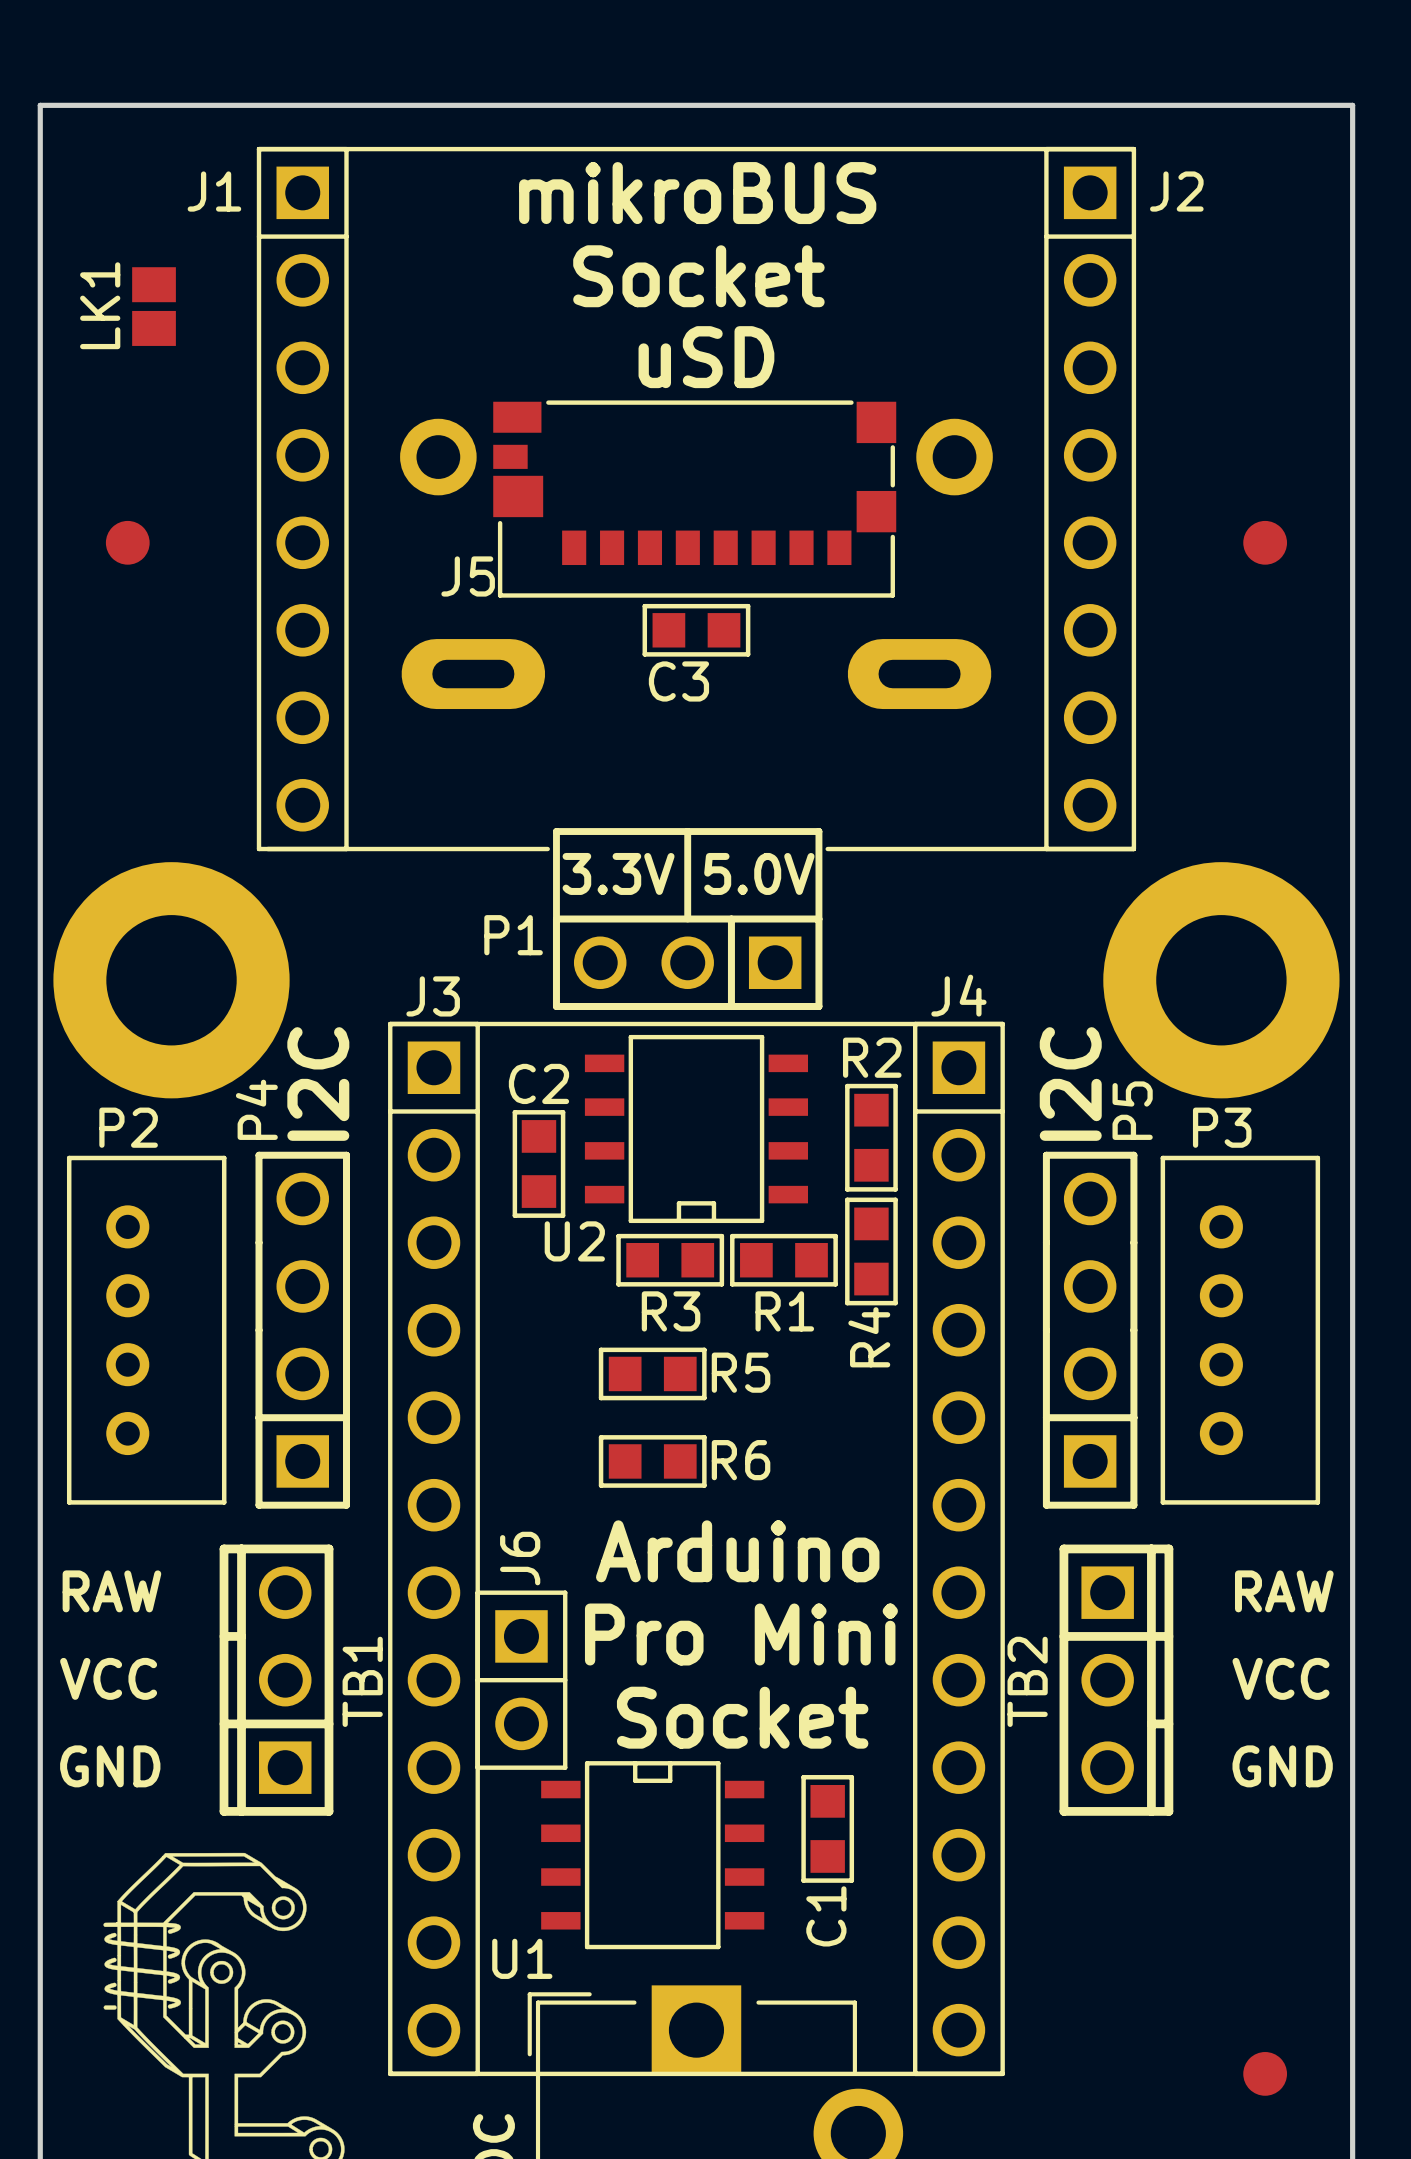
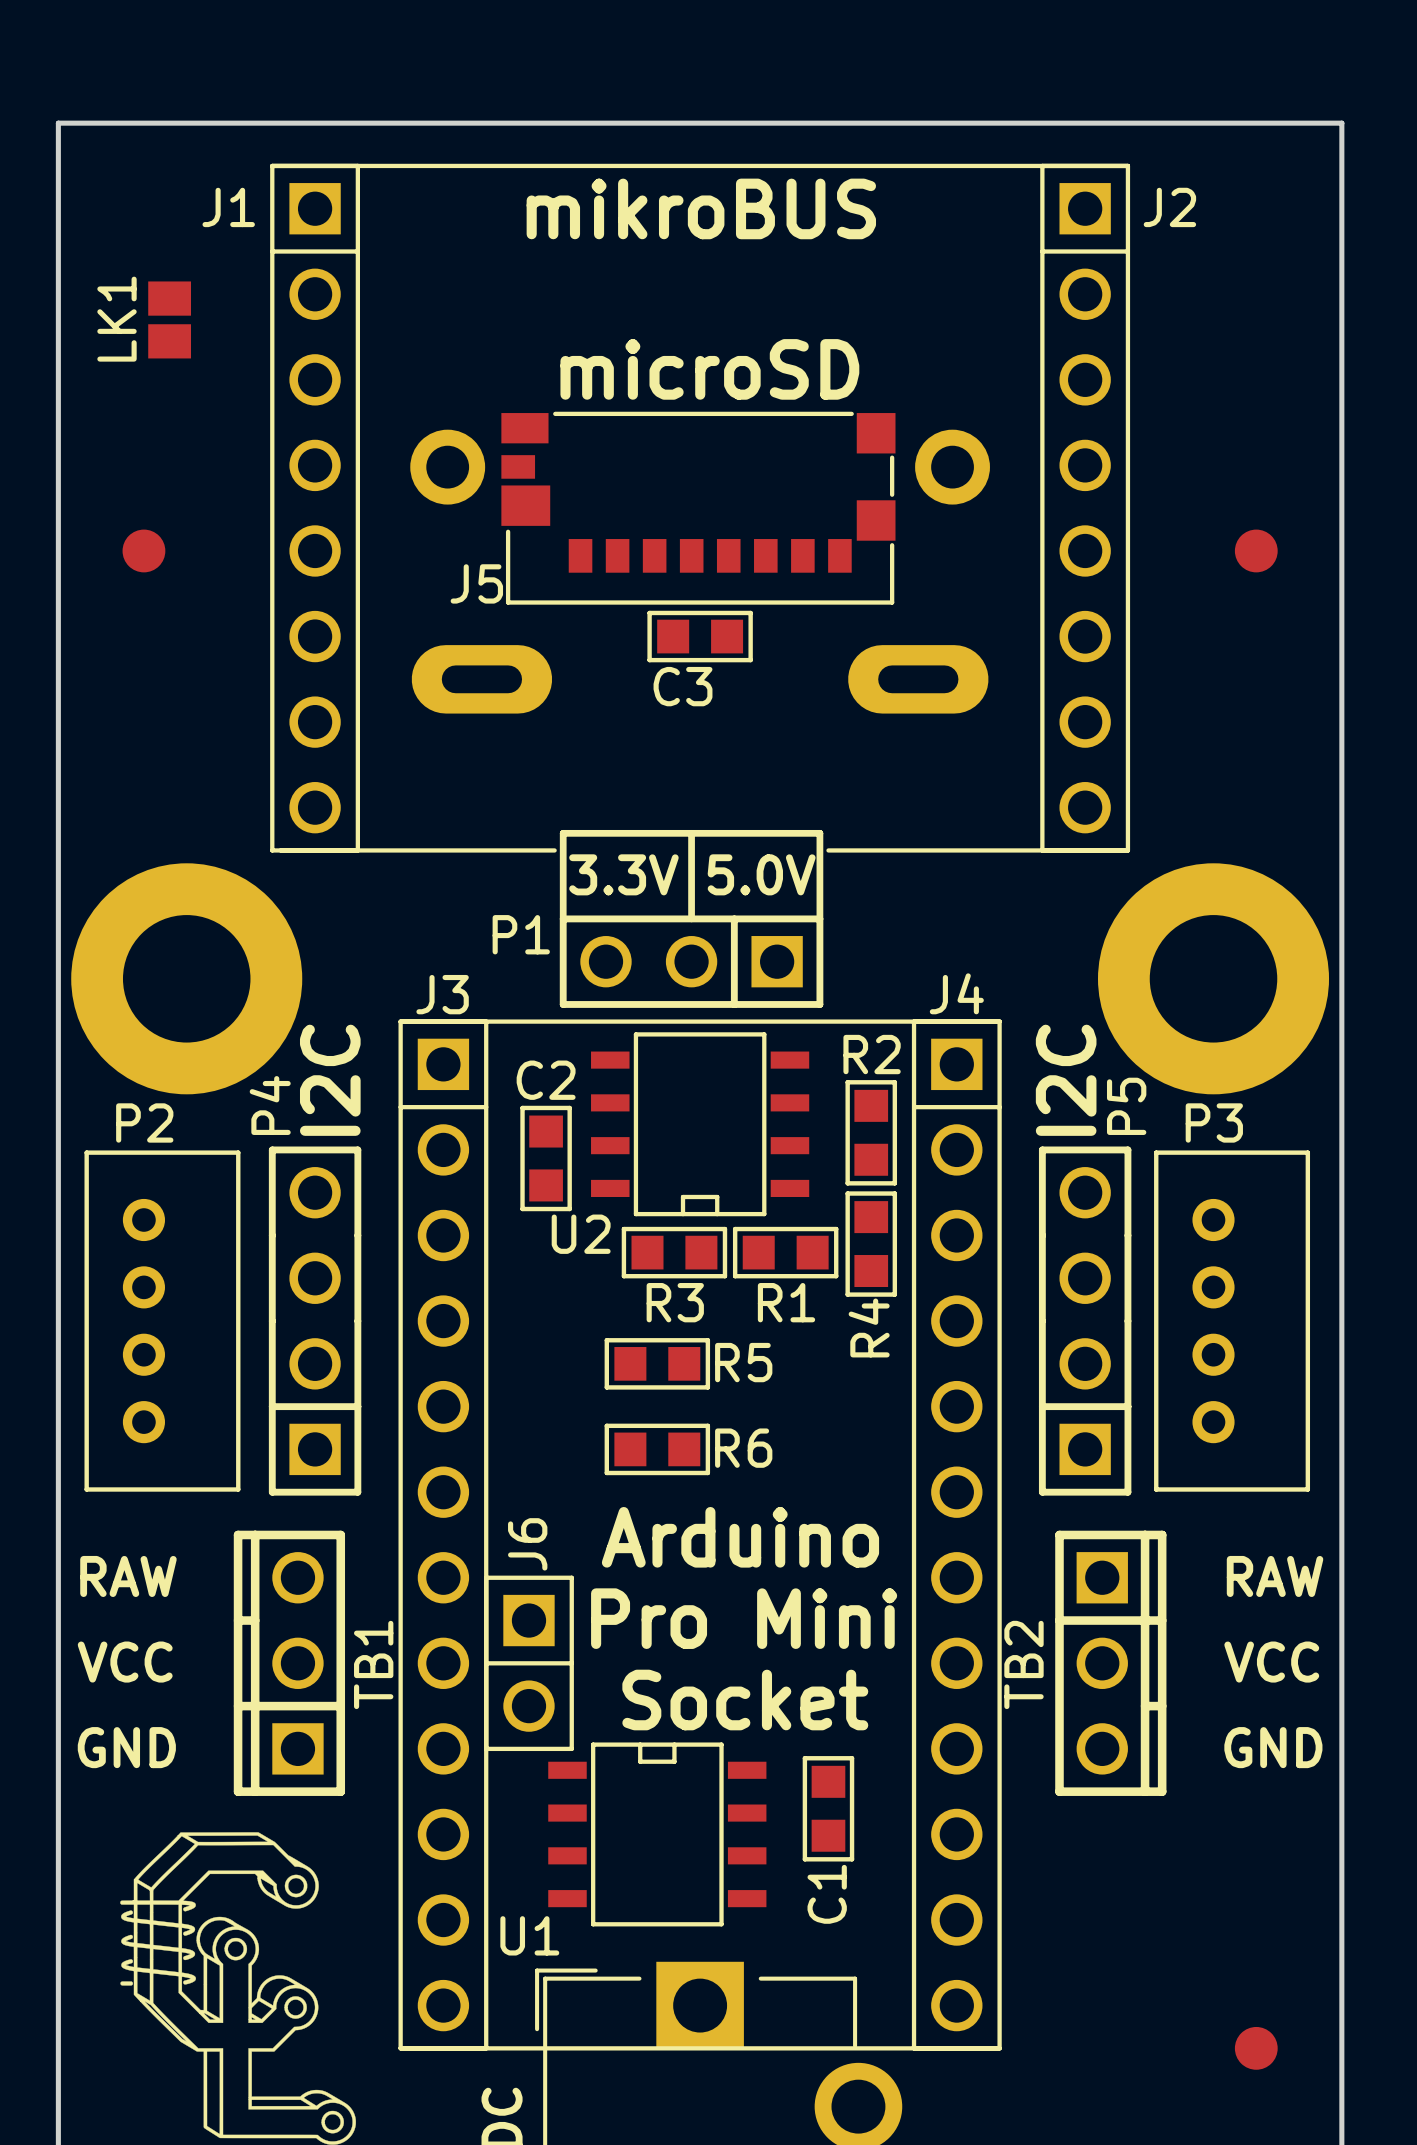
text: Socket (698, 276) -> none
text: uSD (706, 357) -> microSD (709, 369)

